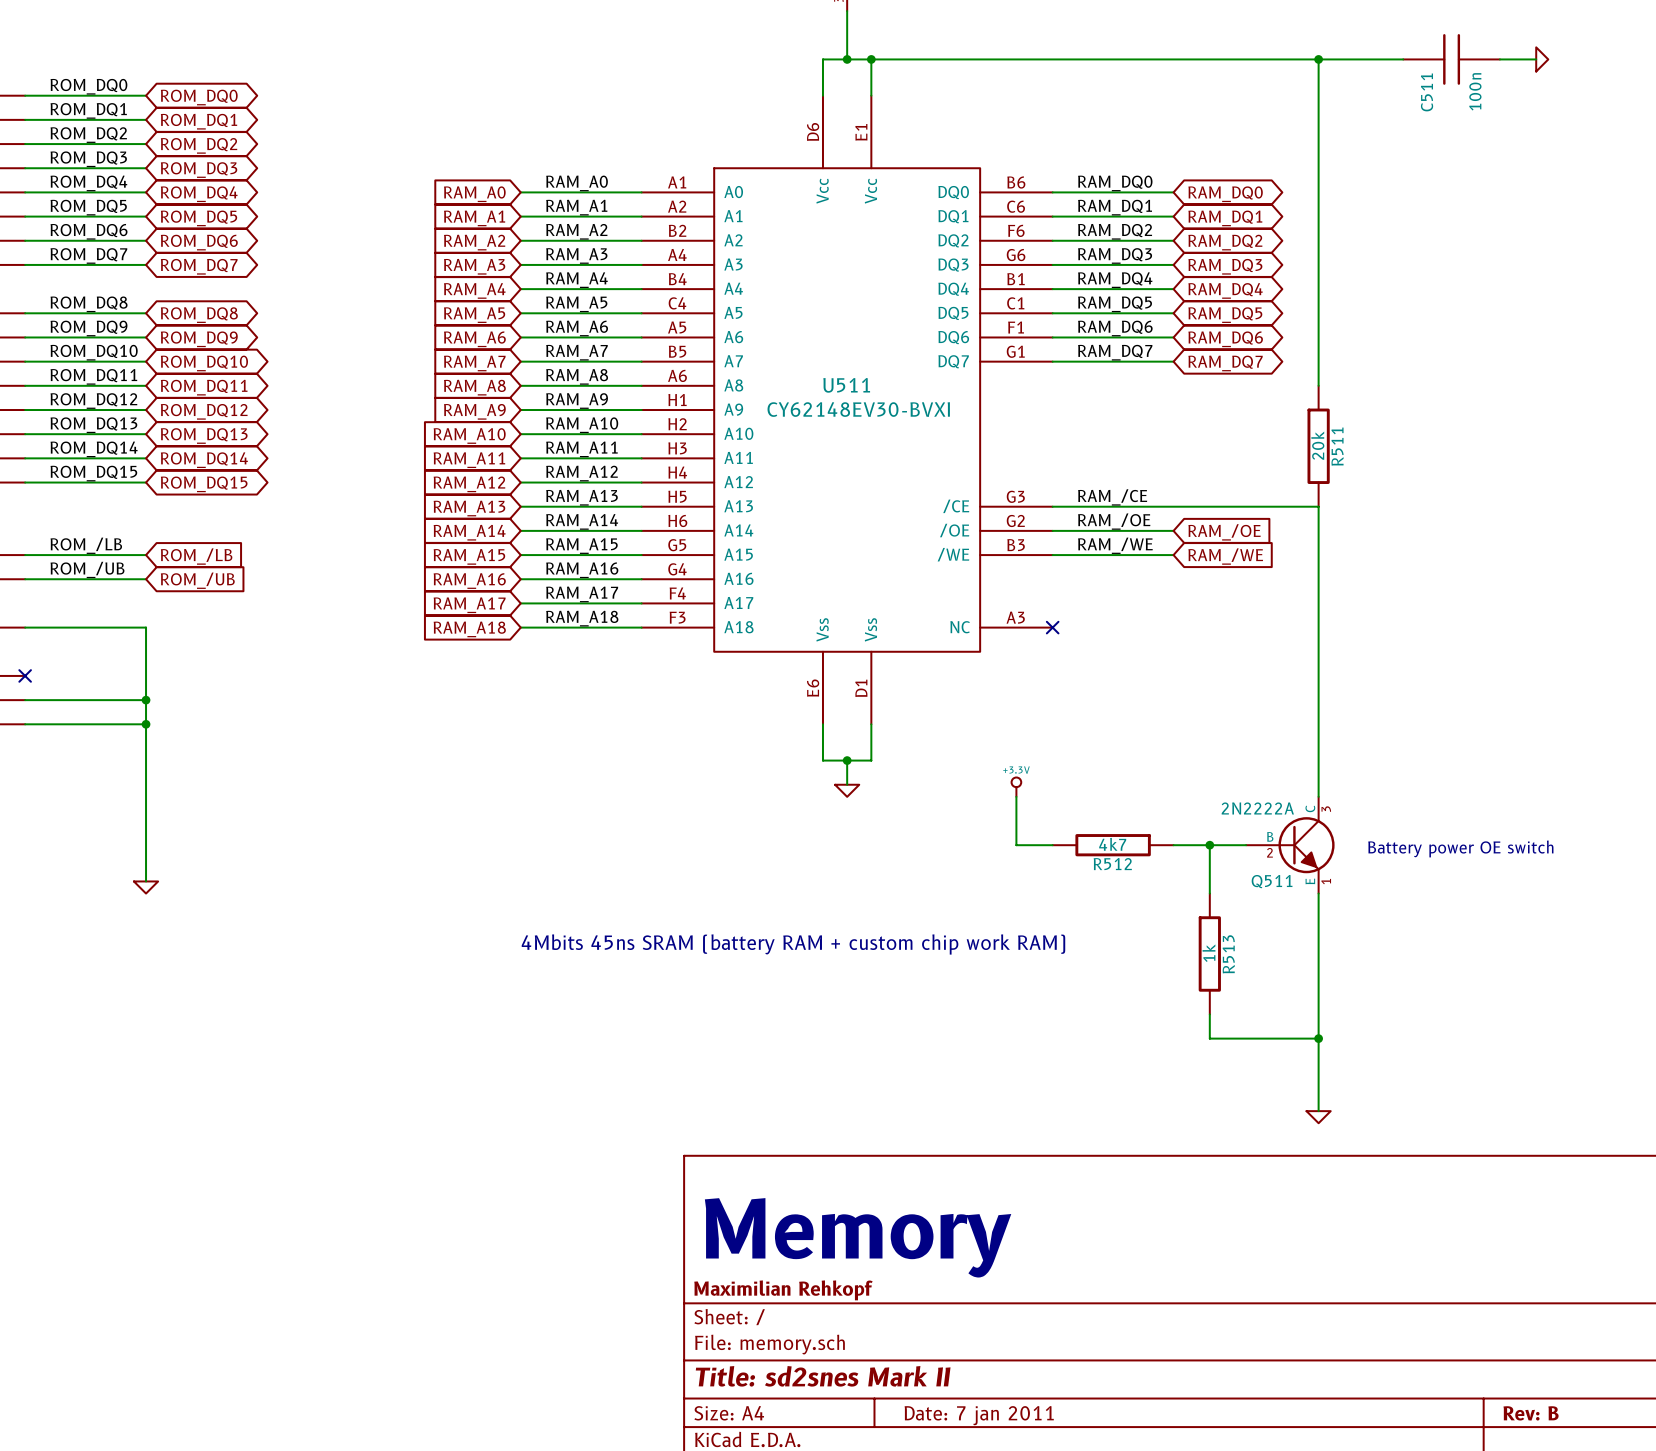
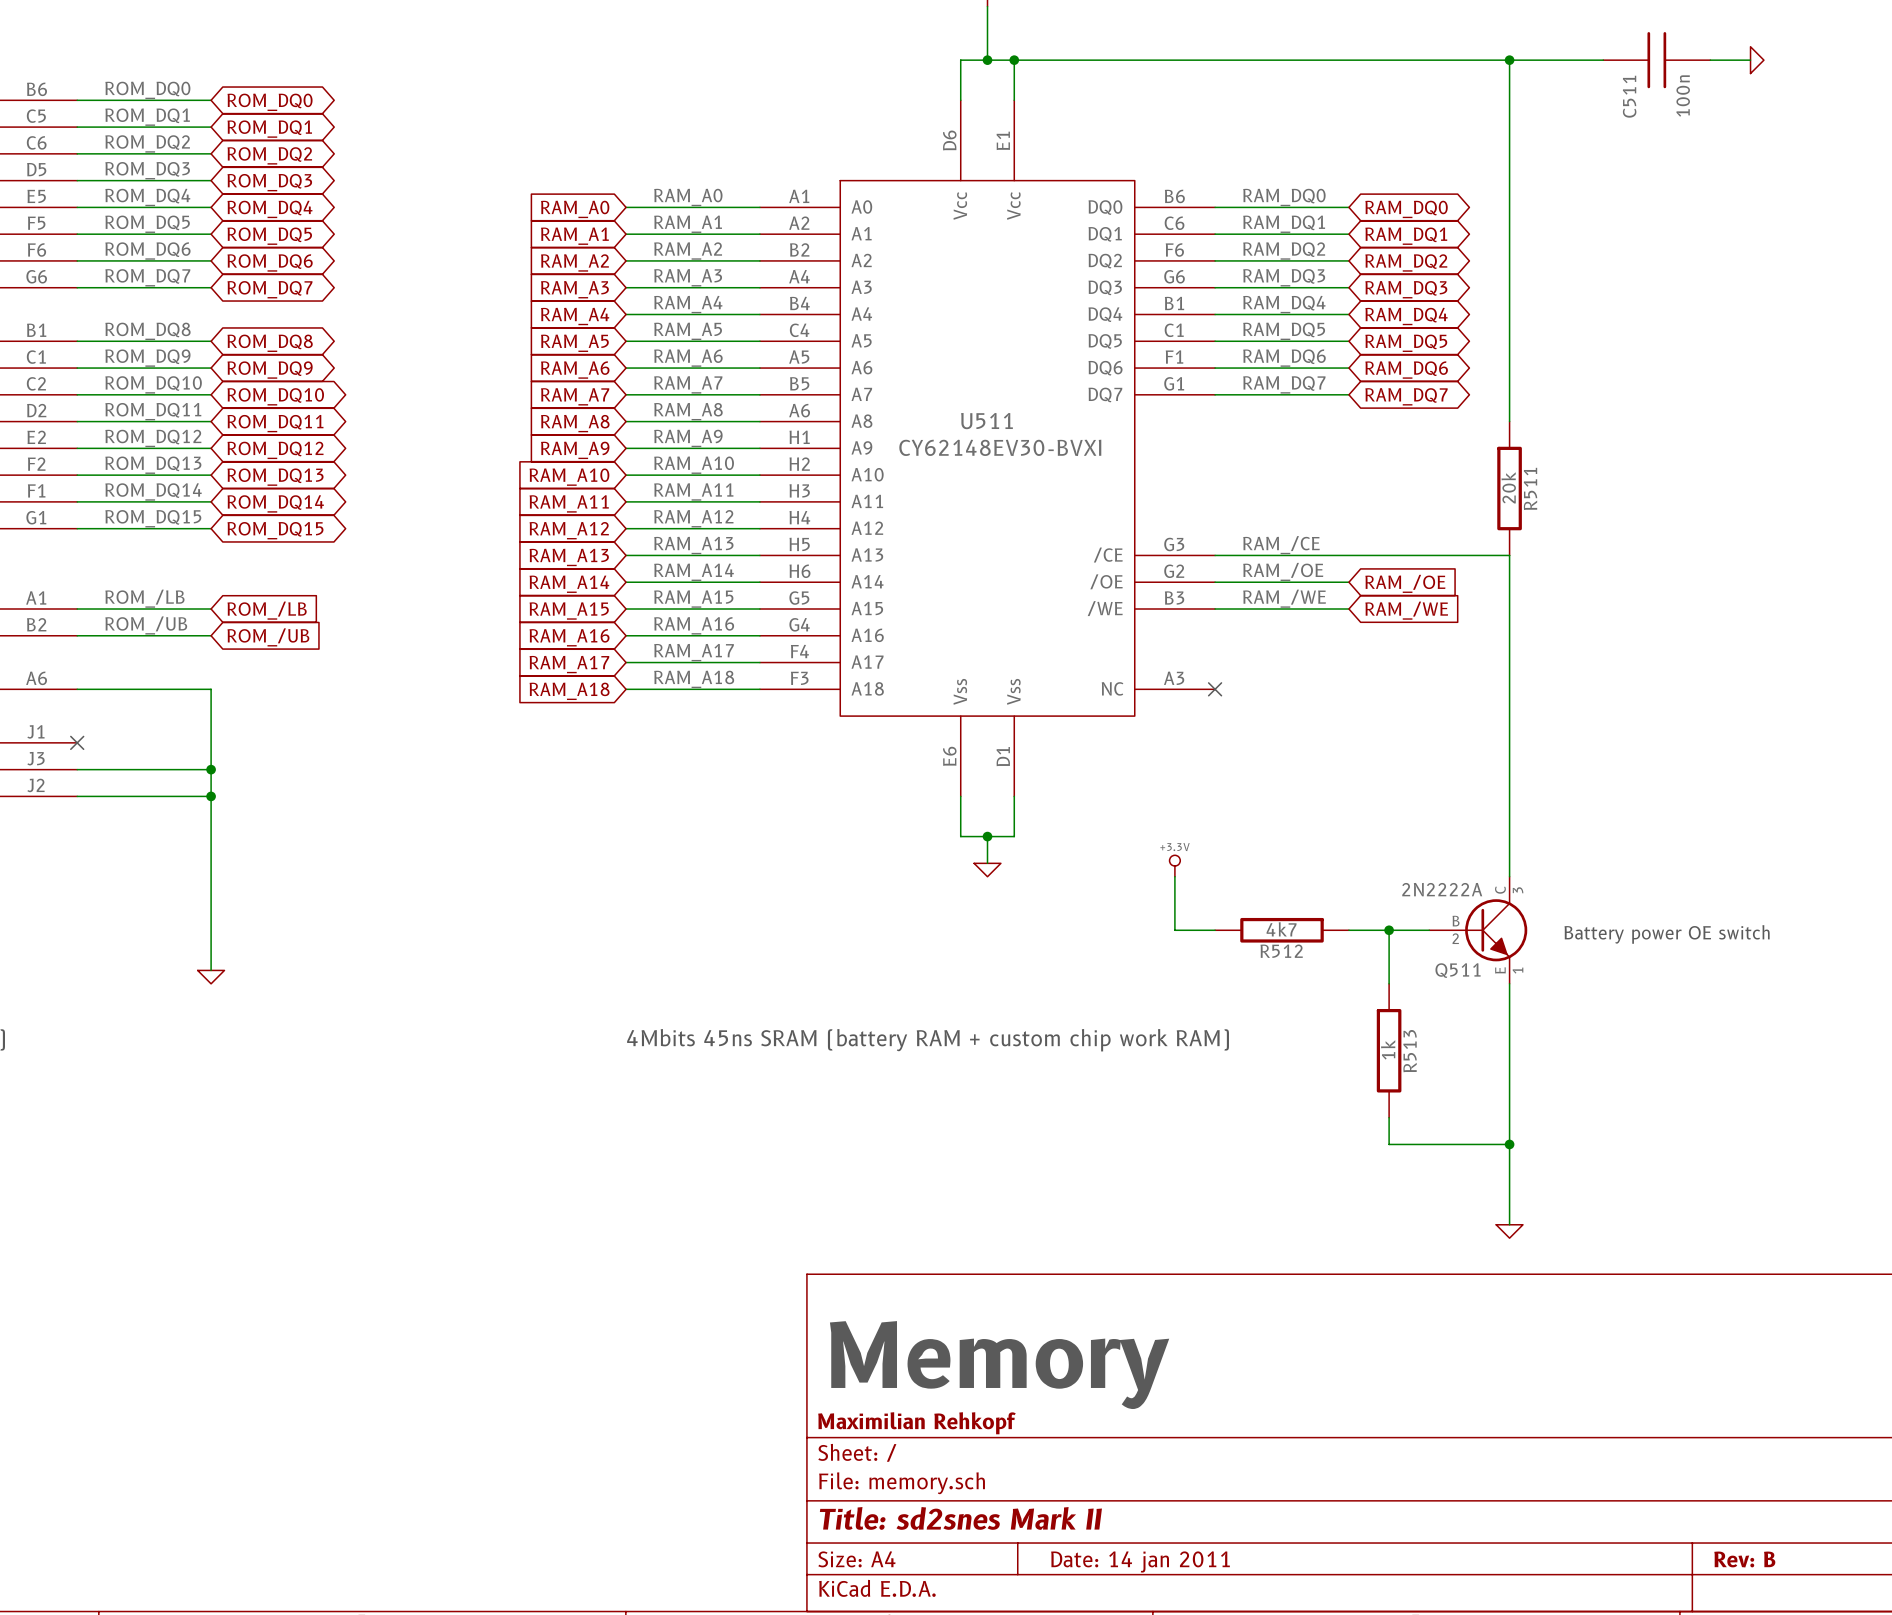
title block: Date: 7 jan 2011 (979, 1415) -> Date: 14 jan 2011 (1140, 1561)

